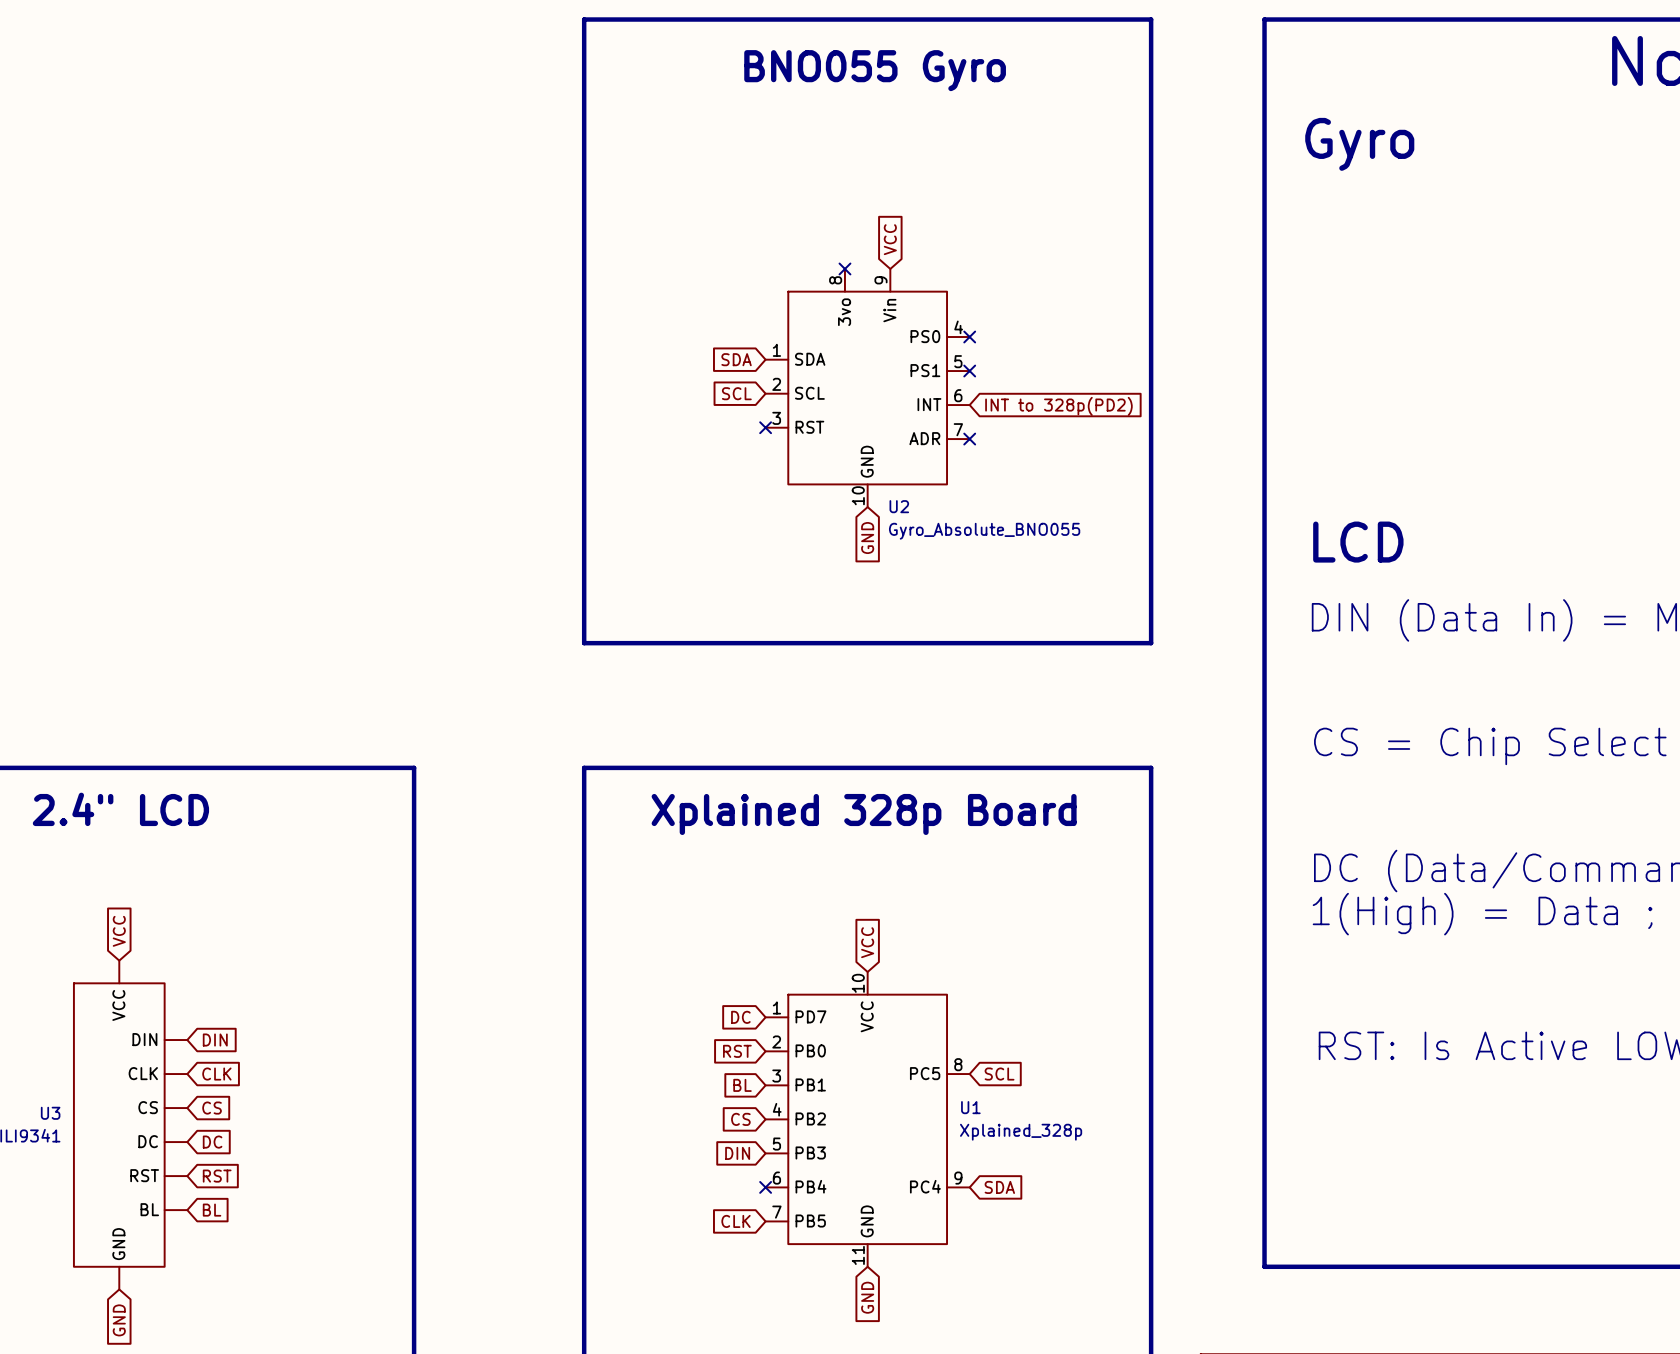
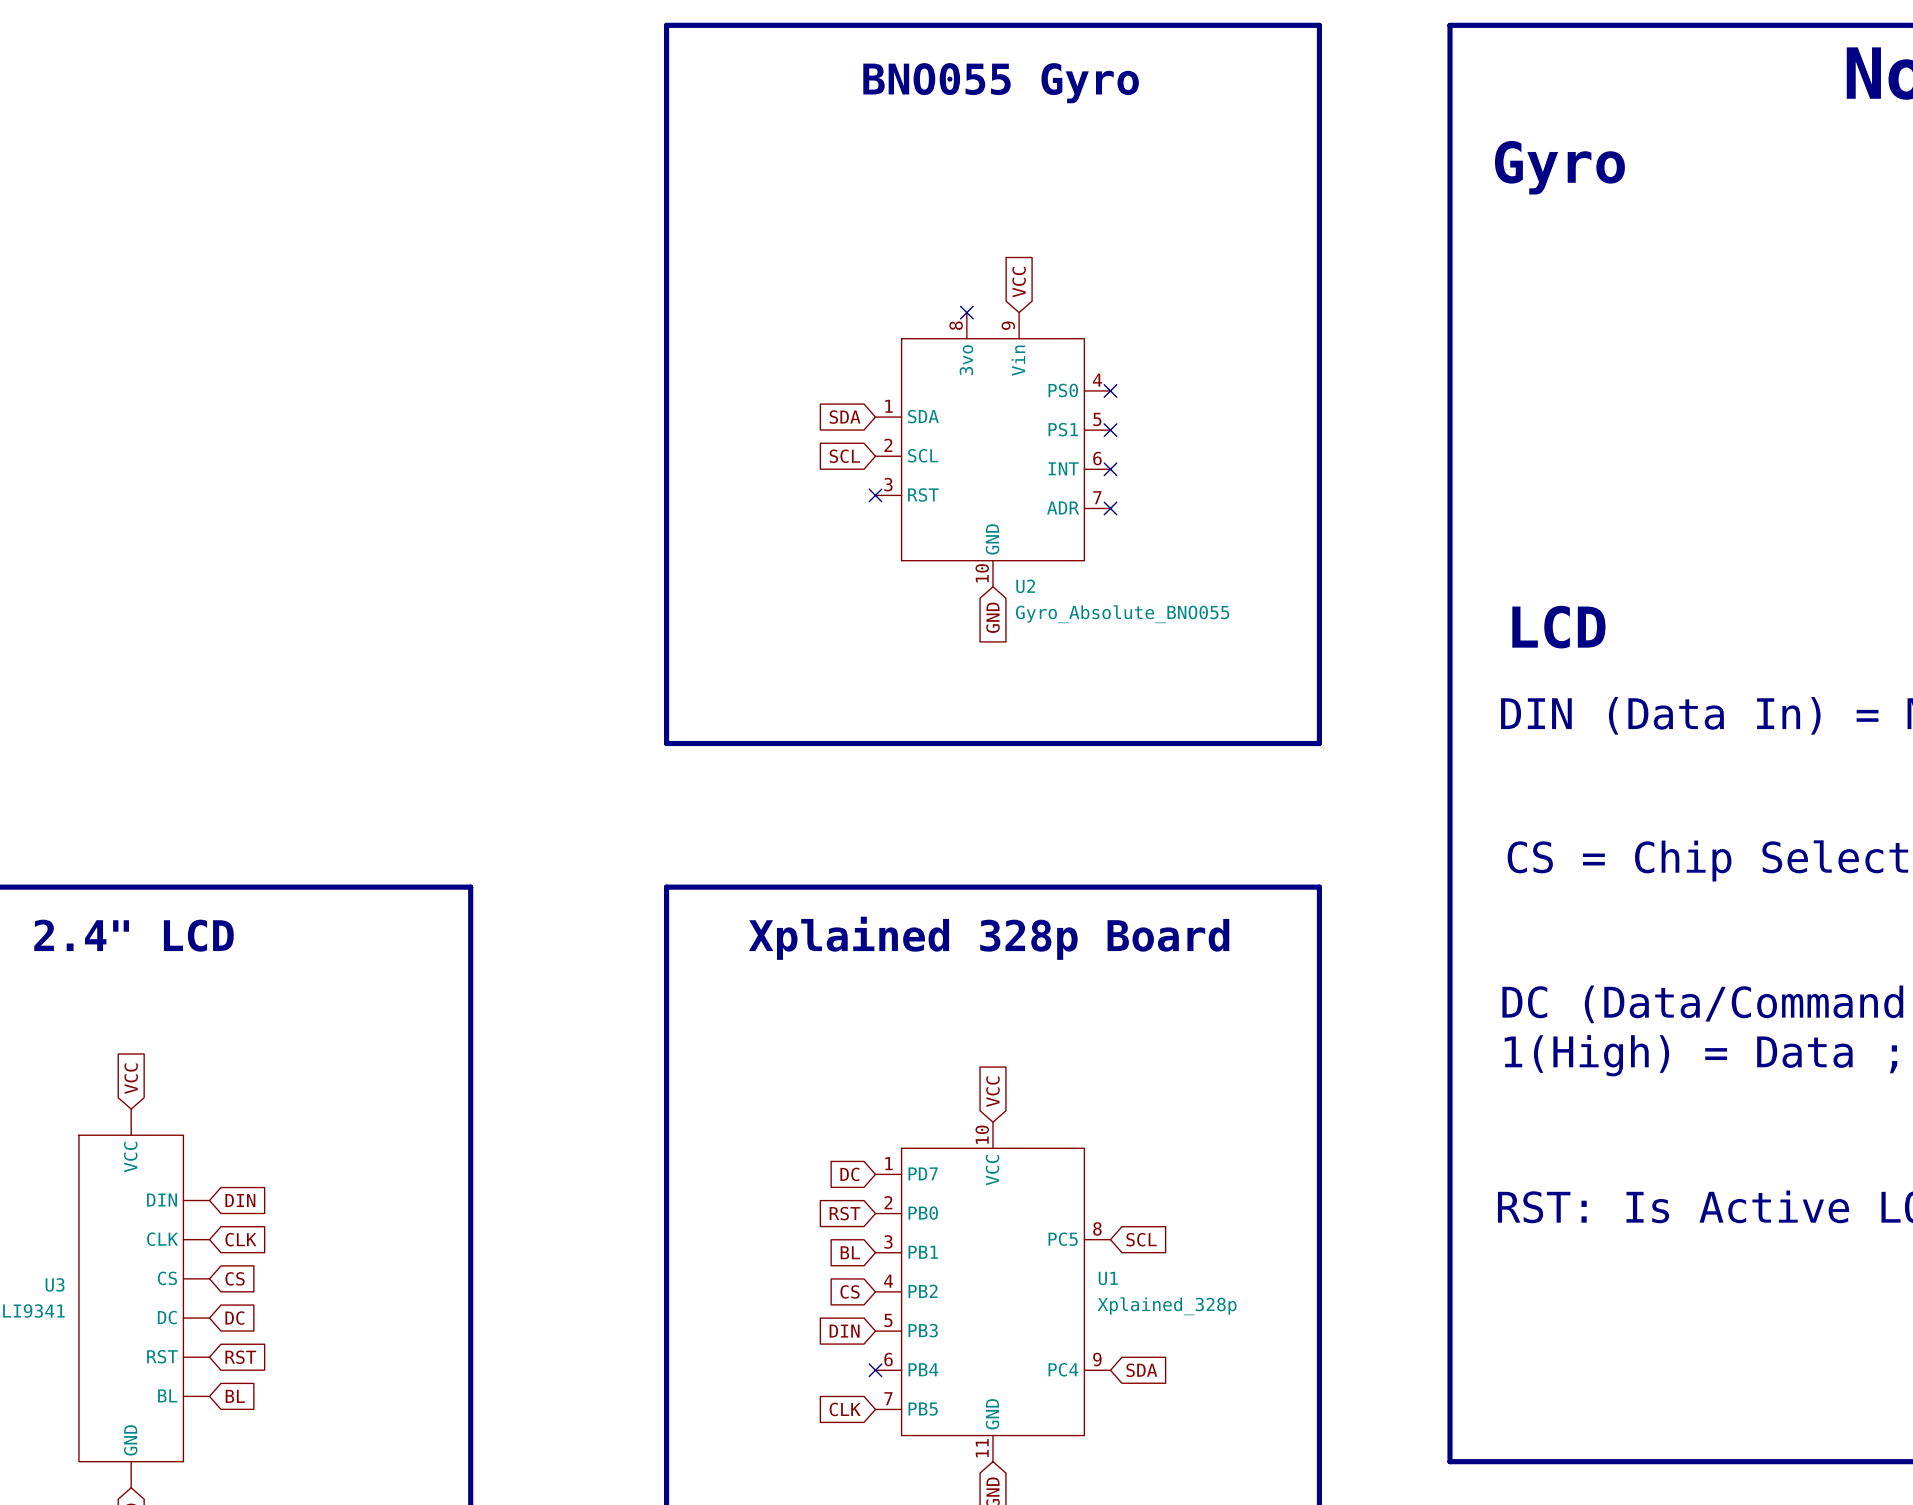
no-connect mark: none -> (1110, 469)
global label: INT to 328p(PD2) (1058, 406) -> none

